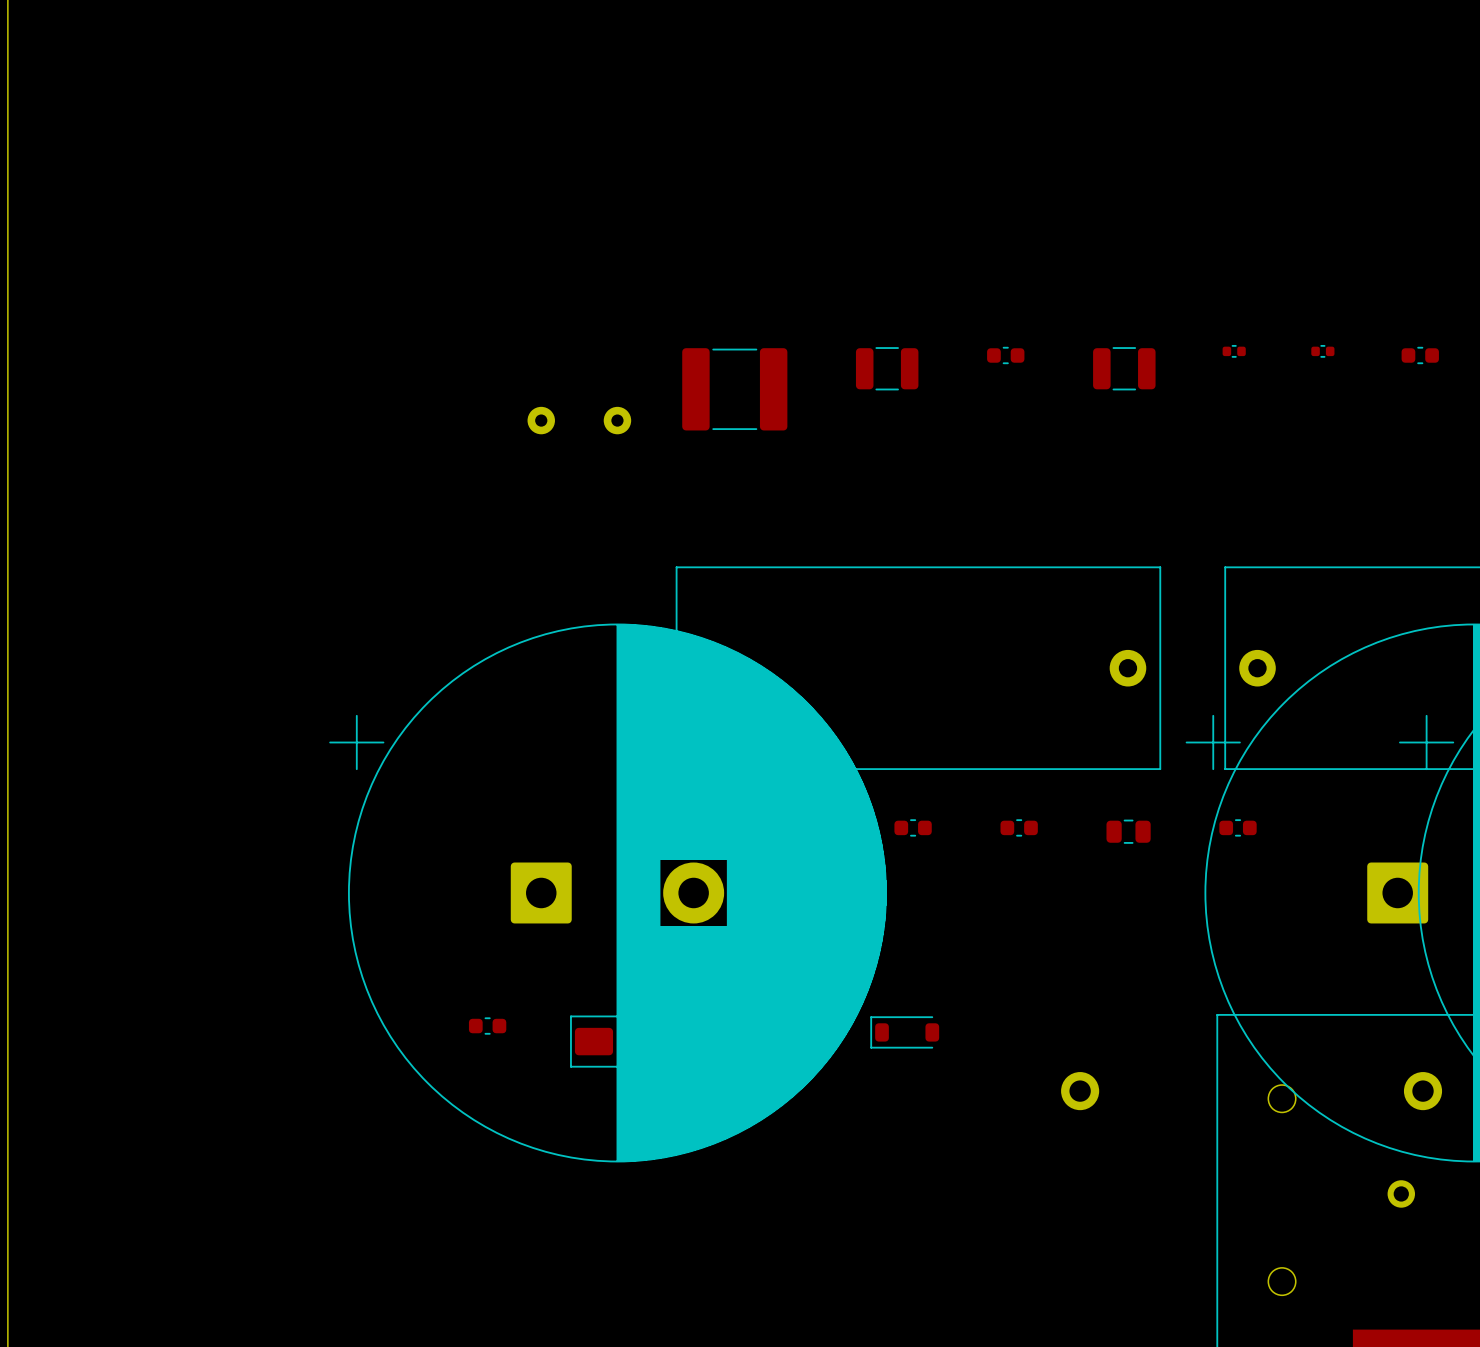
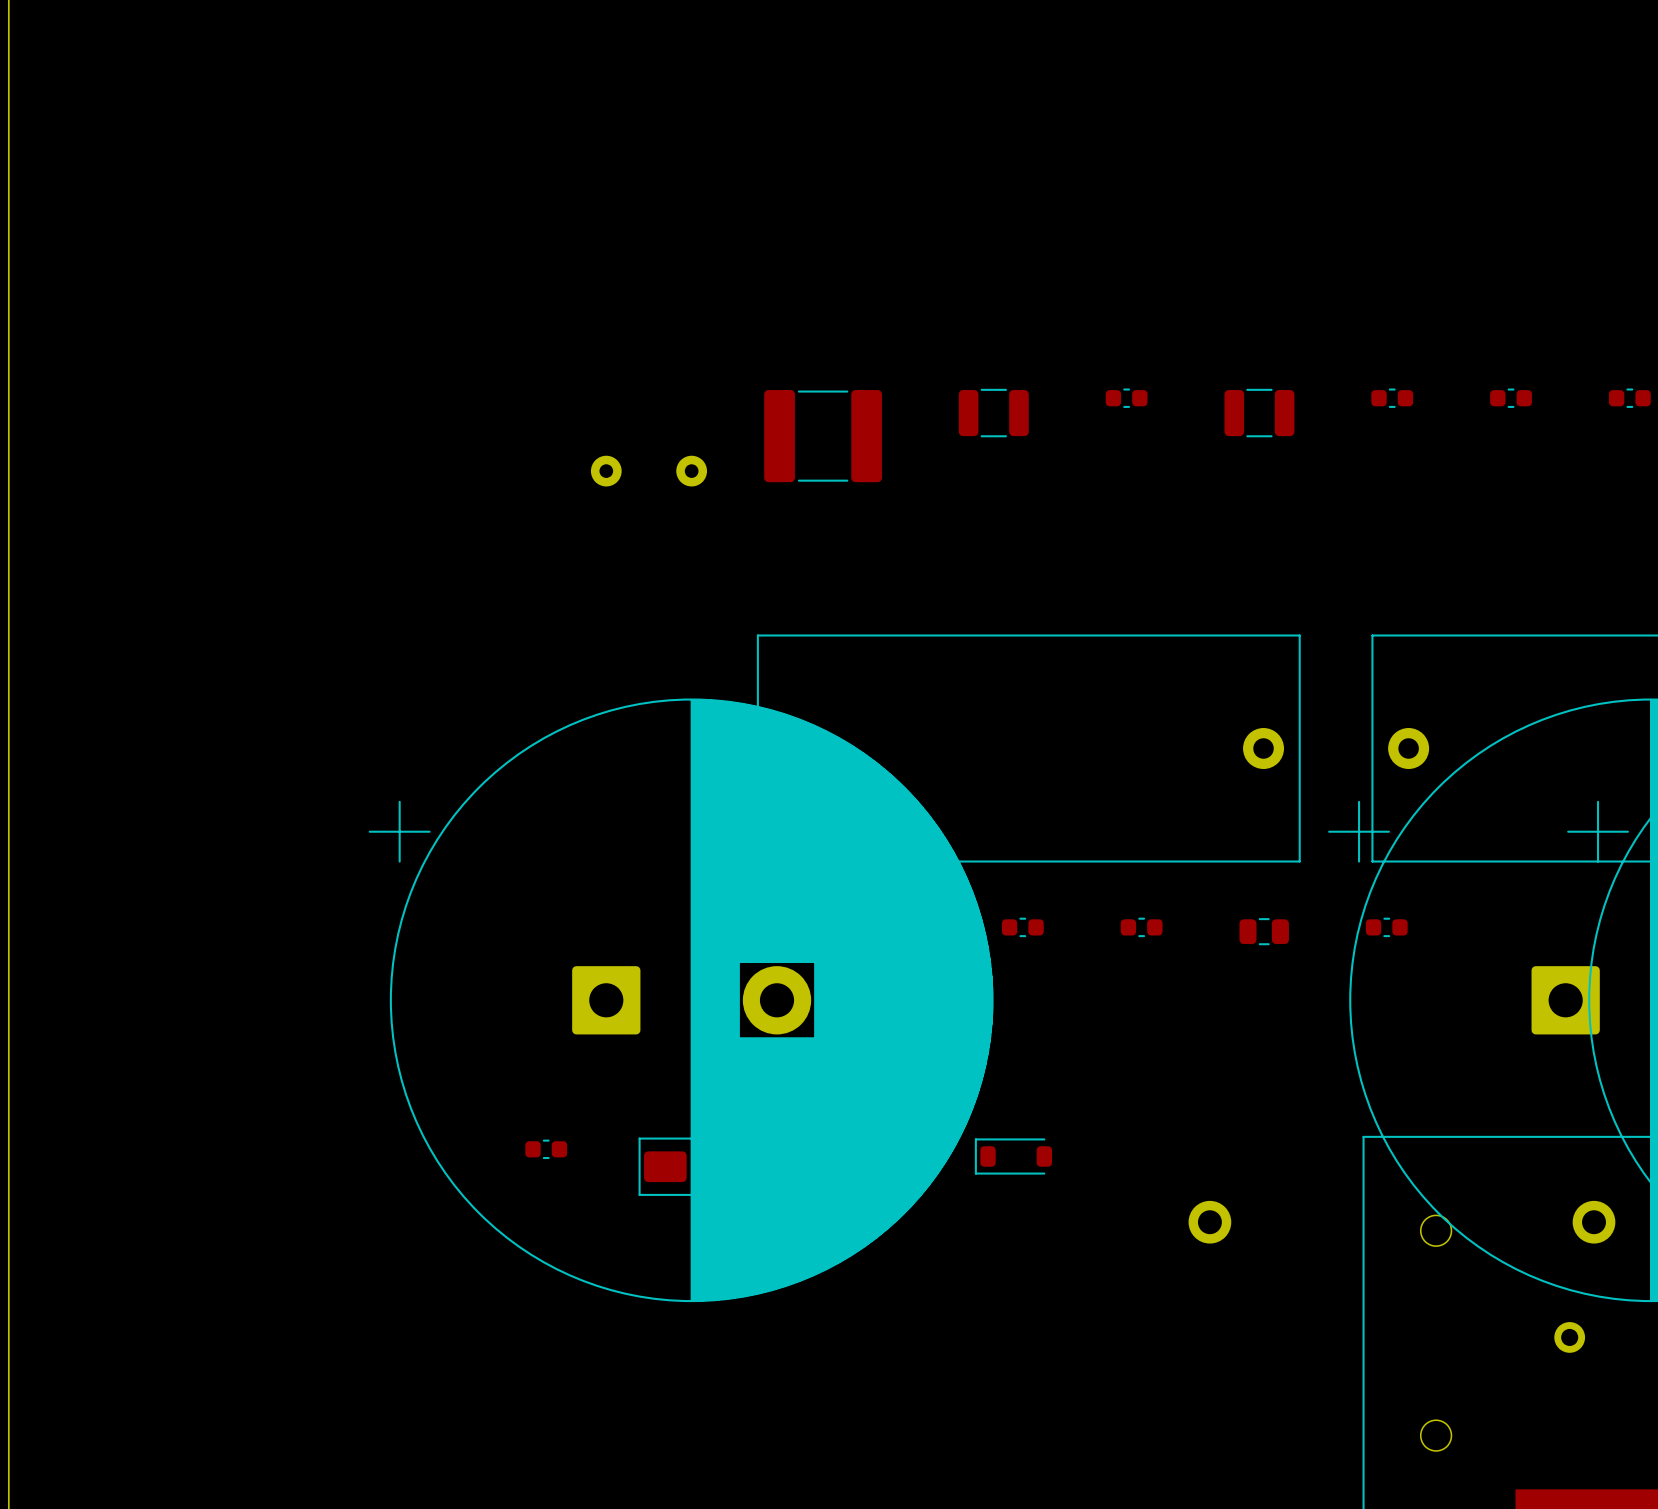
part footprint: [1222, 344, 1246, 358] -> [1371, 388, 1414, 408]
part: (1322, 351) -> none
part: none -> (1511, 398)
part position: (1420, 355) -> (1629, 398)

